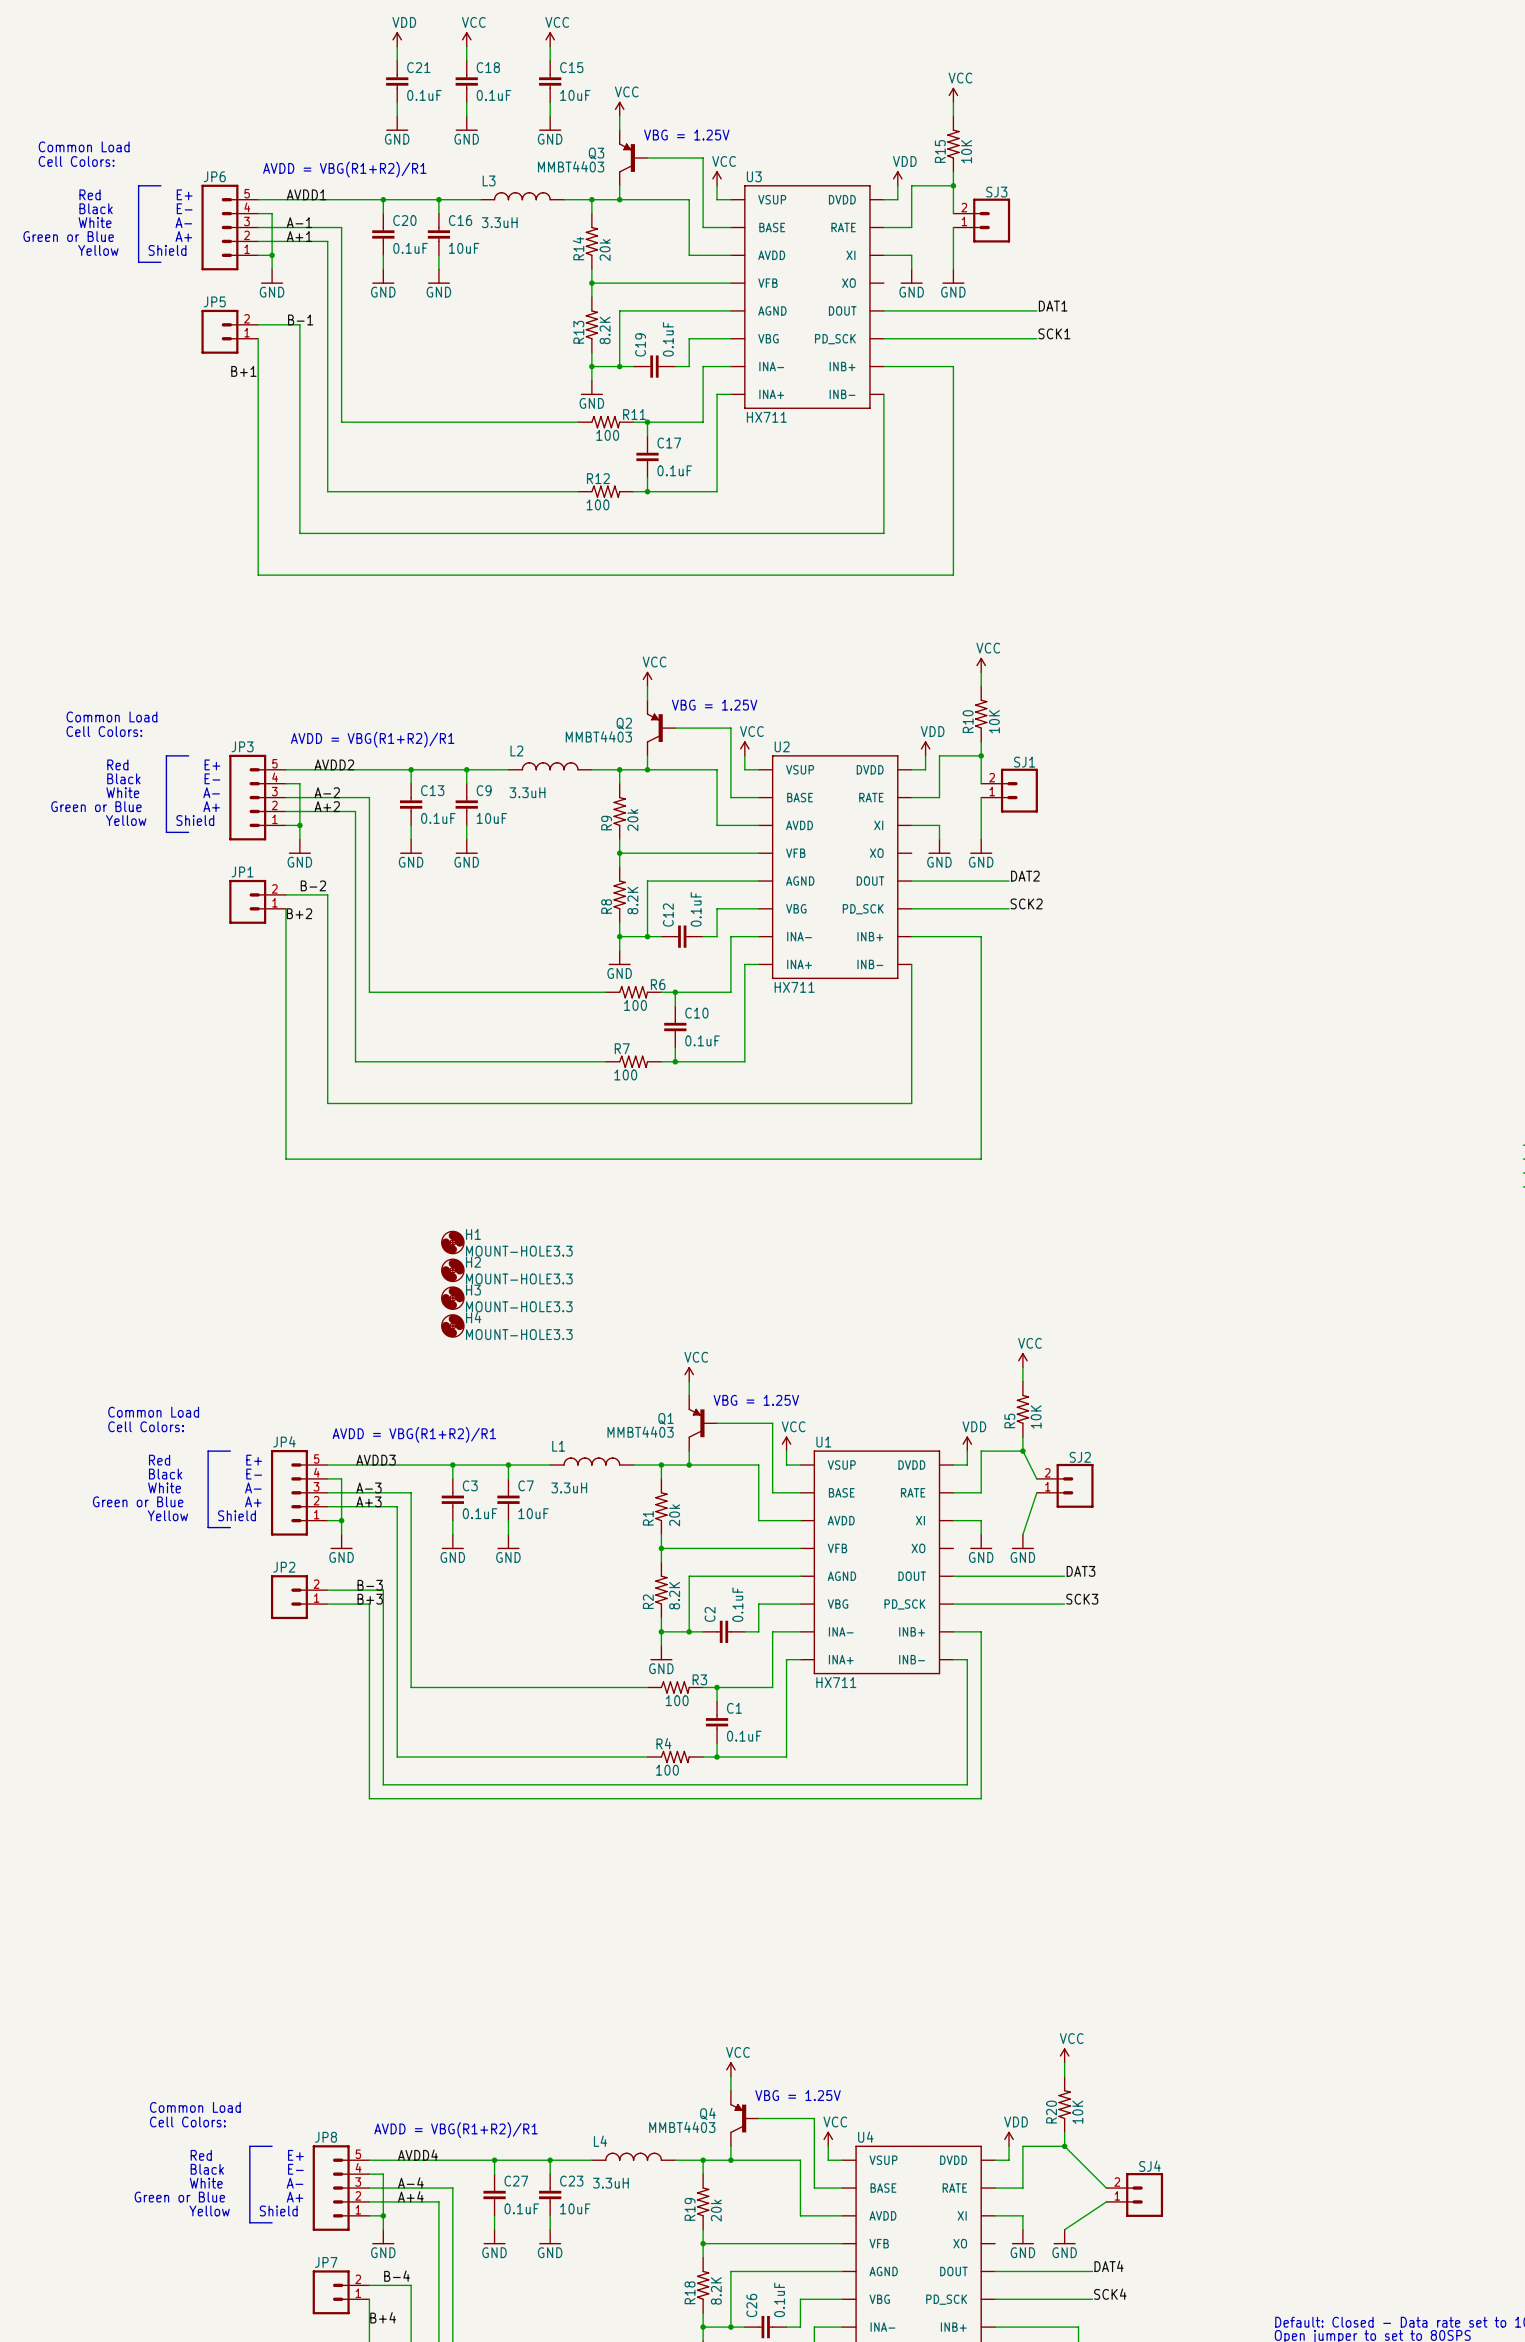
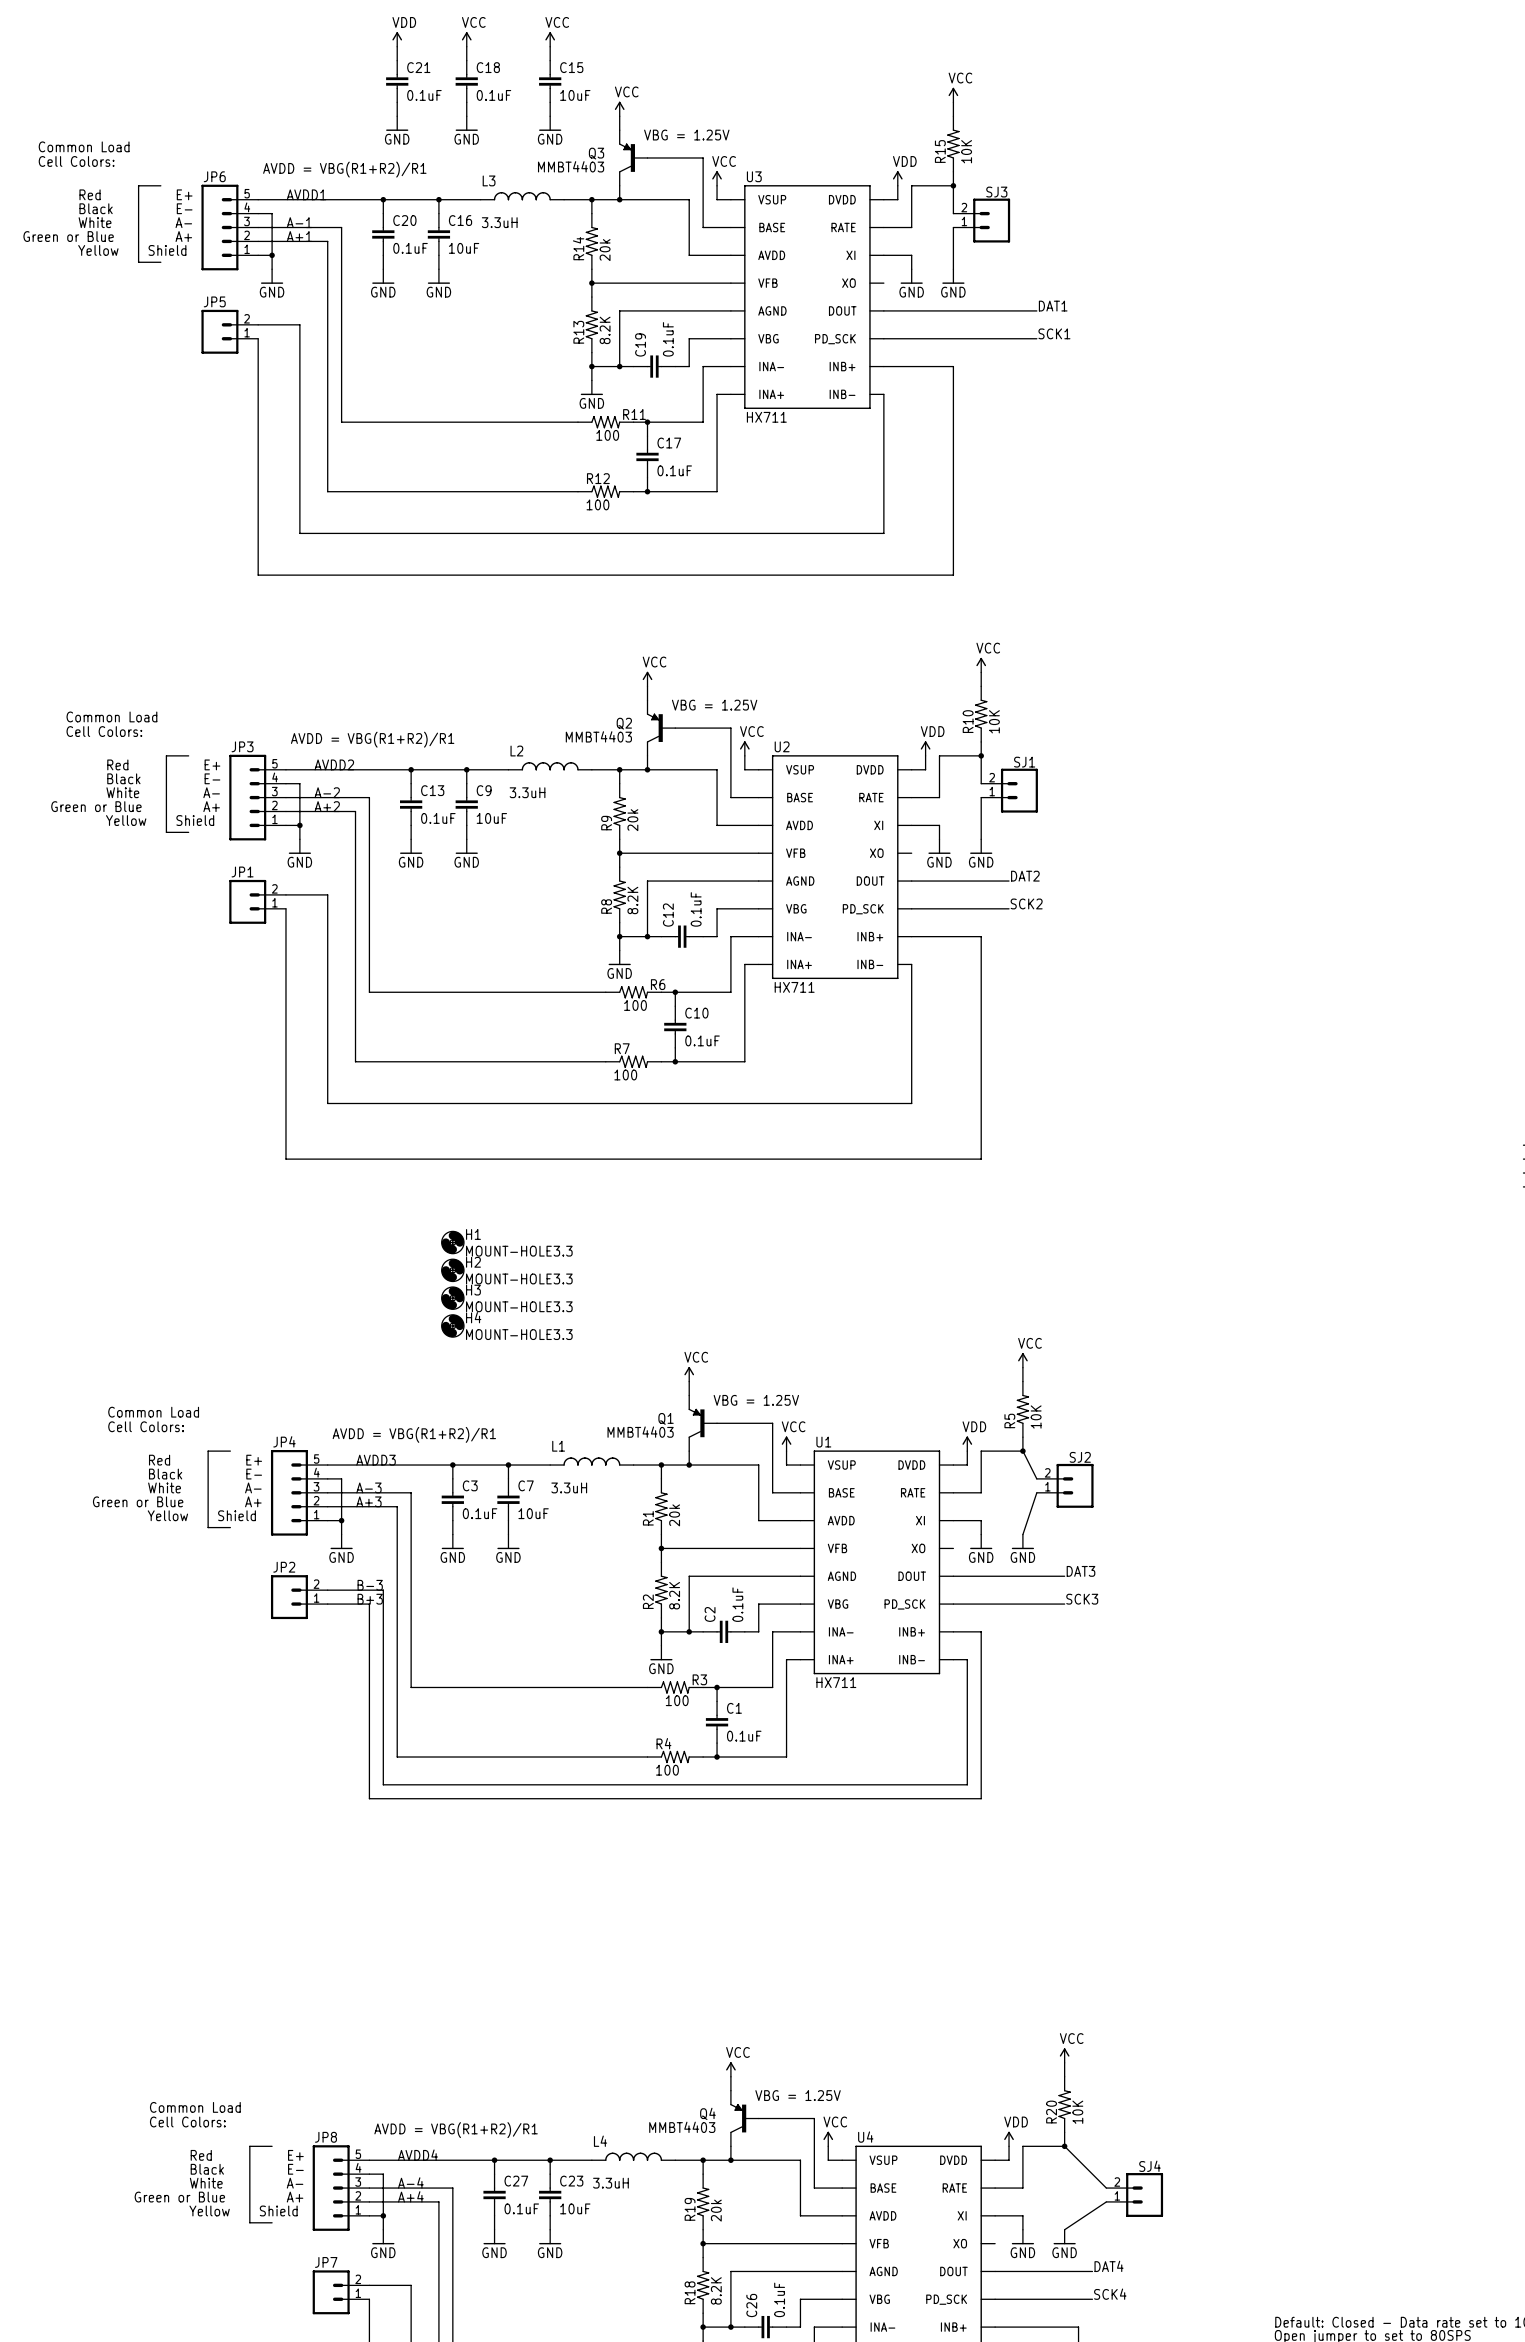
label: B-1 (300, 319) -> none
label: B+1 (243, 371) -> none
label: B-2 (313, 885) -> none
label: B+2 (299, 913) -> none
label: B-4 (397, 2276) -> none
label: B+4 (383, 2317) -> none

